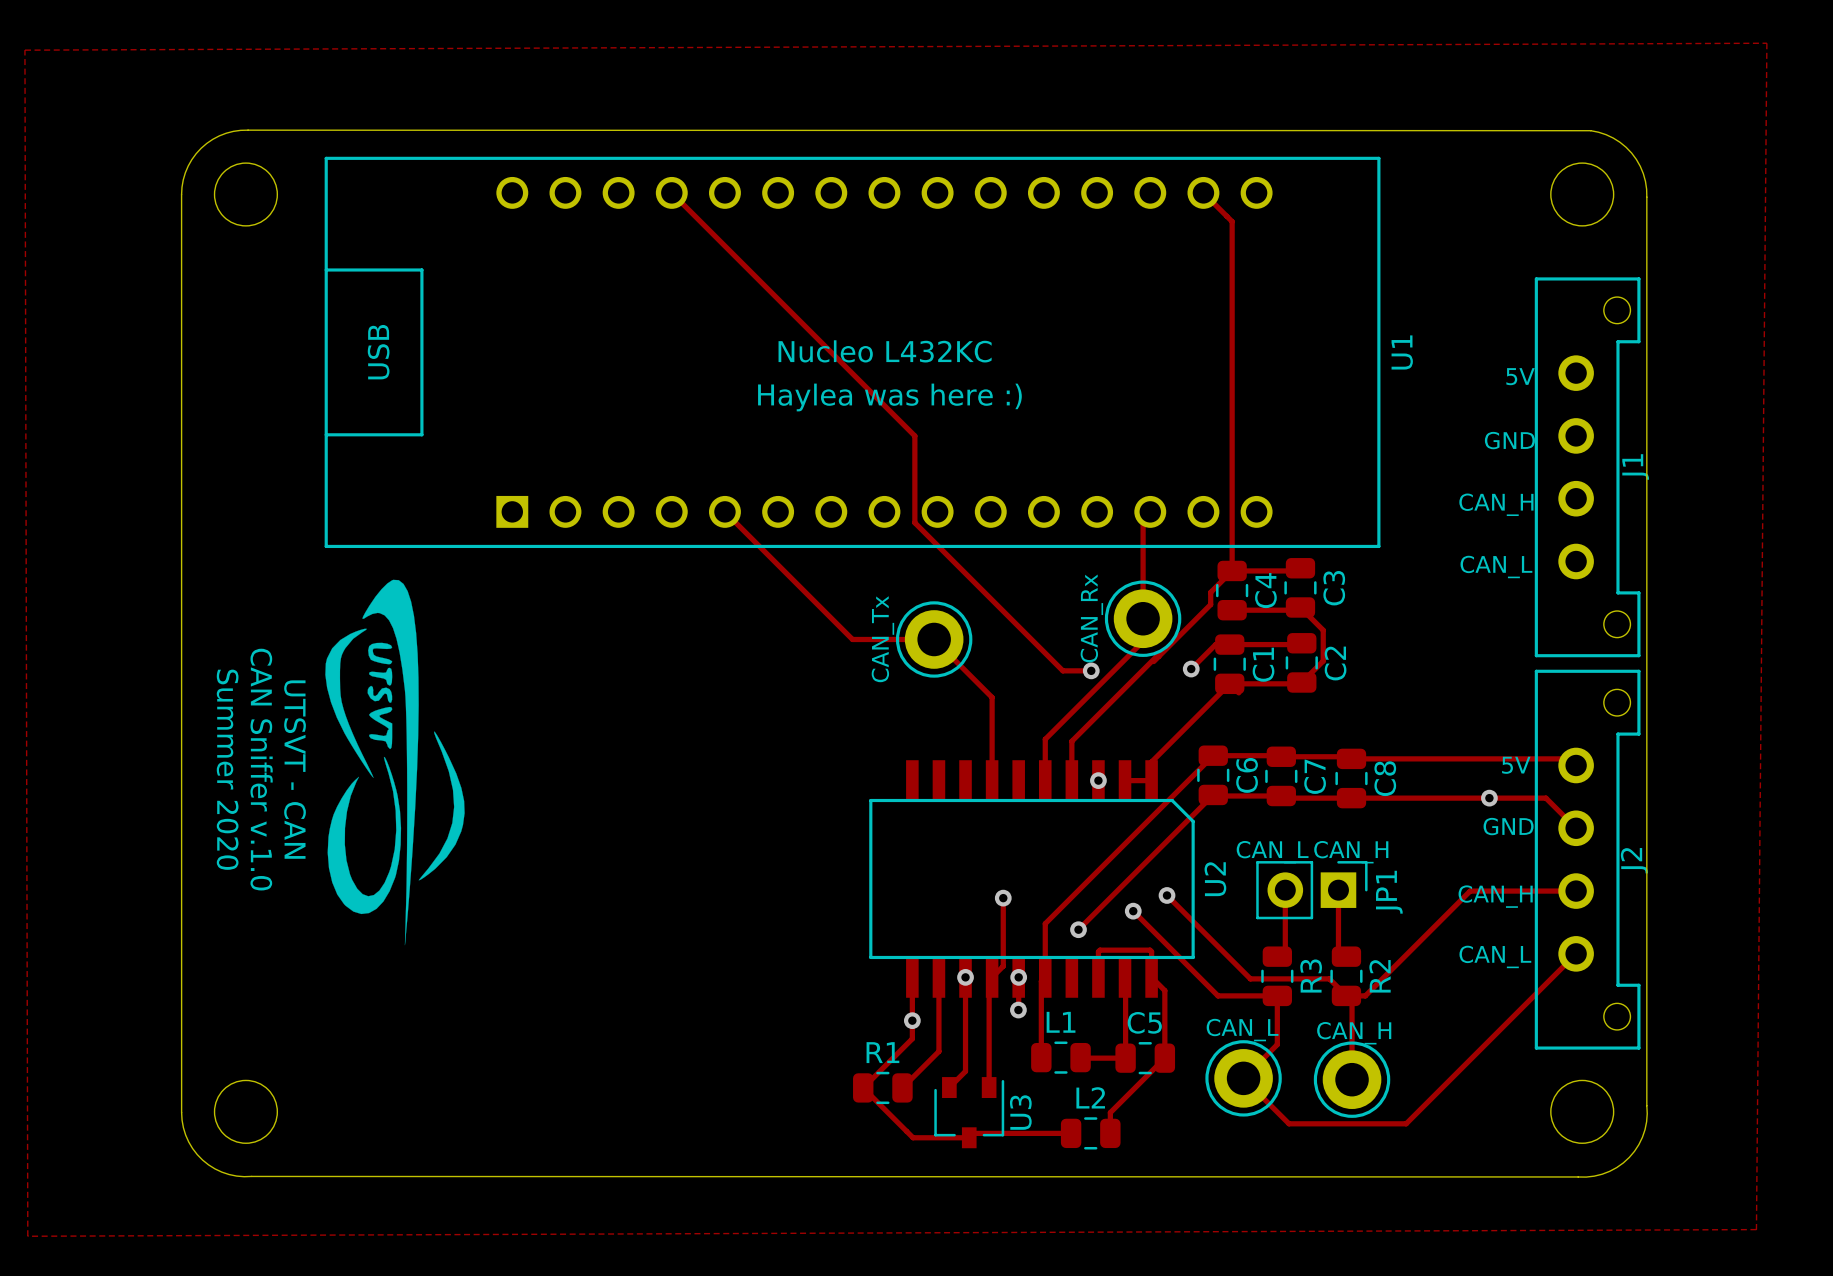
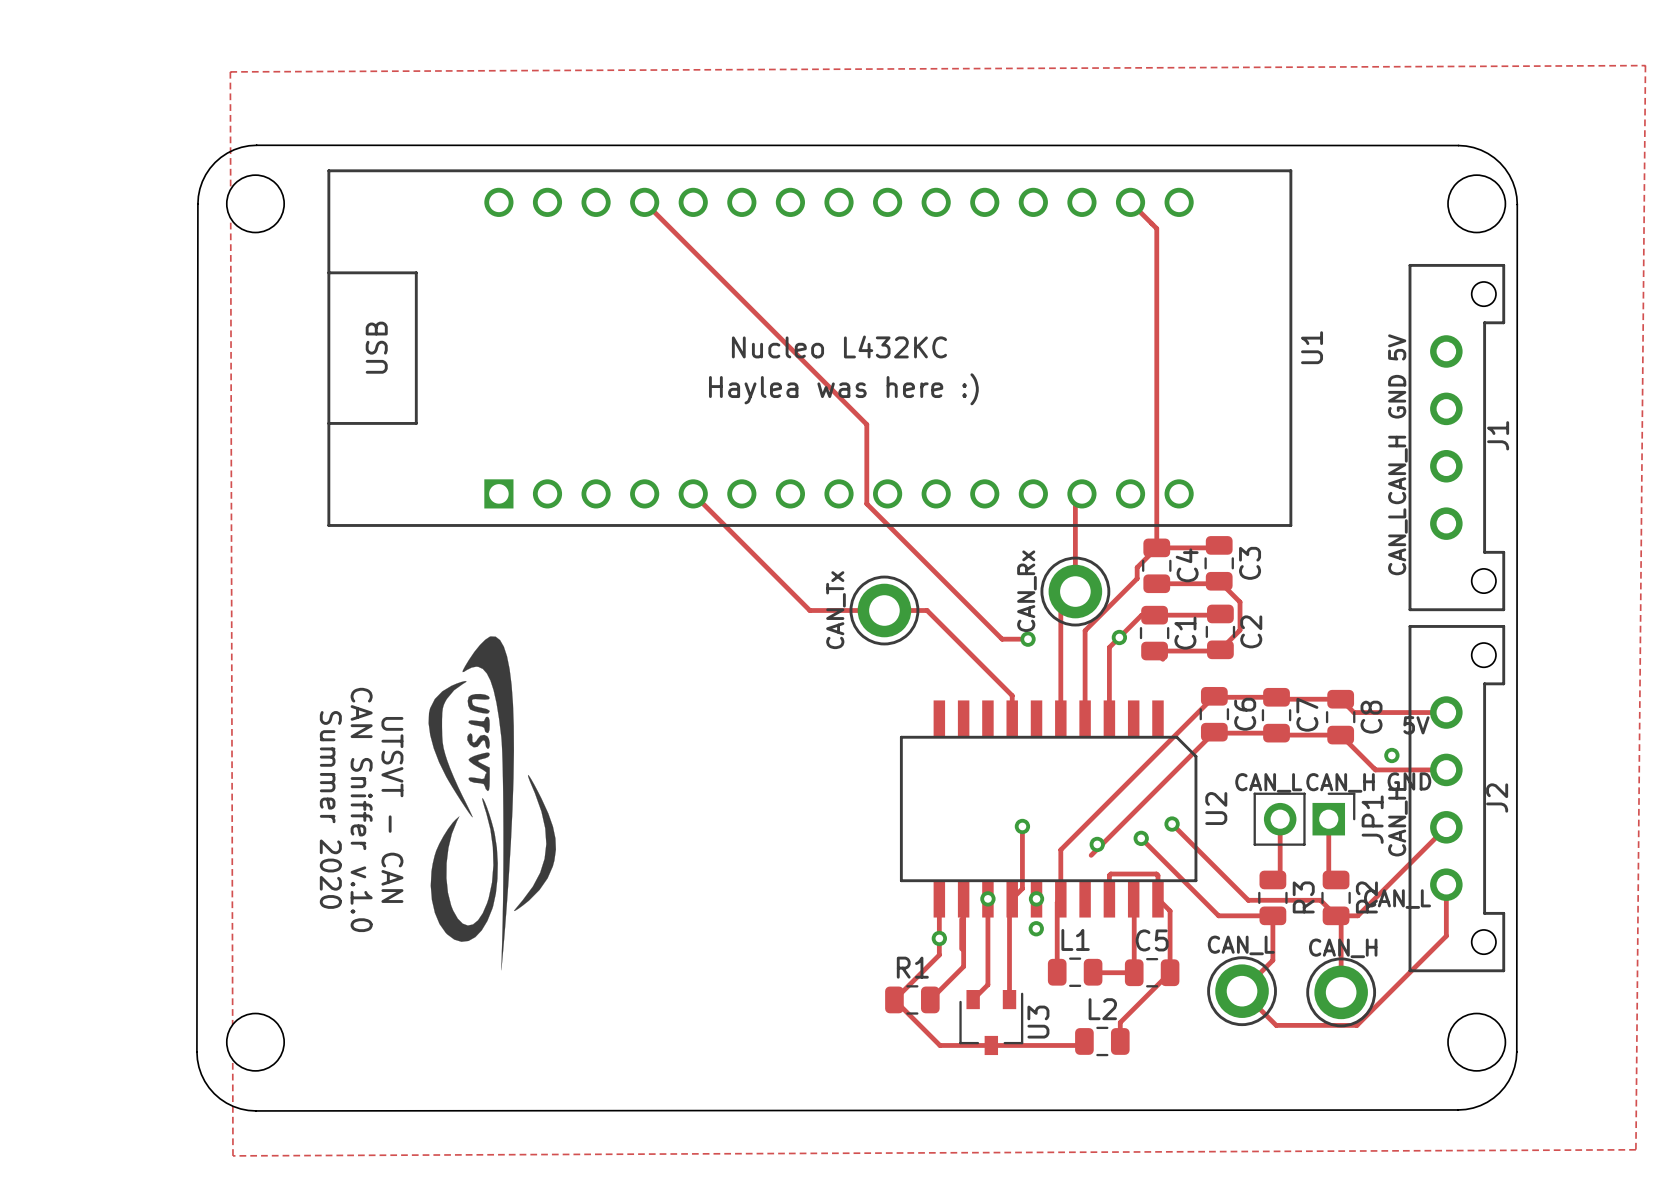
zone outline: (1766, 43) (24, 50) (27, 1236) (1756, 1229) -> (1645, 65) (230, 71) (232, 1155) (1635, 1149)
board edge: (248, 130) (1590, 130) (1606, 134) (1620, 142) (1631, 153) (1640, 166) (1645, 181) (1646, 197) (1647, 1113) (1642, 1137) (1634, 1151) (1616, 1167) (1602, 1174) (1586, 1177) (244, 1176) (229, 1174) (208, 1164) (197, 1154) (188, 1142) (183, 1127) (181, 1112) (181, 194) (183, 179) (188, 166) (201, 148) (219, 135) (233, 131) (248, 130) -> (256, 145) (234, 149) (215, 162) (202, 181) (197, 204) (196, 1051) (201, 1074) (209, 1087) (220, 1098) (233, 1106) (255, 1110) (1458, 1109) (1480, 1105) (1493, 1098) (1504, 1087) (1514, 1067) (1516, 1051) (1517, 204) (1512, 182) (1505, 168) (1494, 157) (1473, 147) (1458, 145) (256, 145)
text rotation: 0° (1520, 376) -> 90° counterclockwise (1397, 347)
text rotation: 0° (1509, 440) -> 90° counterclockwise (1397, 396)
J1 position: (1587, 467) -> (1456, 437)
text rotation: 0° (1496, 504) -> 90° counterclockwise (1397, 469)
text rotation: 0° (1496, 566) -> 90° counterclockwise (1397, 541)
track: (1143, 618) (1143, 641) (1045, 739) (1045, 780) -> none
track: none -> (1060, 606) (1060, 719)
track: (934, 639) (992, 697) (992, 780) -> (884, 610) (927, 610) (1012, 695) (1012, 719)
track: (1158, 656) (1071, 741) (1071, 780) -> none
track: none -> (1085, 630) (1085, 719)
track: none -> (1119, 637) (1109, 647) (1109, 719)
track: (1229, 683) (1151, 761) (1151, 780) (1125, 780) -> none
track: none -> (1446, 712) (1353, 712) (1340, 699) (1214, 696) (1060, 849) (1060, 898) (1057, 902) (1057, 972)
drawing position: (394, 762) -> (492, 803)
track: (1576, 765) (1569, 758) (1351, 758) (1349, 756) (1213, 755) (1045, 923) (1045, 977) (1041, 981) (1041, 1057) -> none
text position: Summer 2020 (227, 769) -> Summer 2020 (330, 809)
text position: CAN Sniffer v.1.0 (261, 769) -> CAN Sniffer v.1.0 (361, 809)
text position: UTSVT - CAN (295, 769) -> UTSVT - CAN (392, 809)
C6 position: (1213, 775) -> (1214, 714)
C7 position: (1281, 776) -> (1276, 715)
C8 position: (1351, 778) -> (1340, 717)
via: (1098, 780) -> none
track: none -> (1446, 769) (1375, 769) (1340, 735) (1214, 732) (1091, 855)
track: (1576, 828) (1545, 798) (1283, 798) (1281, 796) (1213, 794) (1078, 929) -> none
text: none -> CAN_H (1340, 782)
text: CAN_L (1272, 852) -> none
text: CAN_H (1351, 852) -> CAN_L (1268, 782)
J2 position: (1587, 859) -> (1456, 798)
via: none -> (1172, 824)
via: none -> (1022, 826)
track: none -> (1446, 827) (1357, 915) (1336, 915)
U2 position: (1031, 878) -> (1048, 808)
track: none -> (1141, 838) (1218, 915) (1272, 915) (1272, 960) (1242, 991) (1276, 1025) (1356, 1025) (1446, 936) (1446, 884)
via: none -> (1141, 838)
track: (1285, 890) (1285, 948) (1277, 956) -> (1280, 819) (1280, 872) (1272, 879)
JP1 position: (1311, 890) -> (1304, 819)
track: (1338, 890) (1338, 948) (1346, 956) -> (1328, 819) (1328, 872) (1336, 879)
track: (1576, 891) (1470, 891) (1365, 995) (1346, 995) -> none
track: (1167, 895) (1250, 978) (1329, 978) (1352, 1001) (1352, 1079) -> (1172, 824) (1248, 900) (1320, 900) (1341, 920) (1341, 992)
text rotation: 0° (1495, 896) -> 90° counterclockwise (1397, 822)
track: (1003, 898) (1003, 966) (989, 980) (989, 1087) -> (1022, 826) (1022, 888) (1009, 901) (1009, 999)
via: (1003, 898) -> none
track: (1133, 911) (1218, 995) (1277, 995) (1277, 1044) (1243, 1078) (1289, 1123) (1406, 1123) (1576, 953) -> none
via: (1133, 911) -> none
via: (1078, 929) -> none
track: none -> (939, 898) (939, 955) (894, 999) (939, 1045) (1080, 1045) (1084, 1041)
via: none -> (987, 898)
via: none -> (1036, 898)
R3 position: (1277, 976) -> (1272, 897)
R2 position: (1346, 976) -> (1336, 897)
track: (912, 977) (912, 1038) (863, 1087) (913, 1137) (969, 1137) (973, 1133) (1071, 1133) (1066, 1137) -> none
track: (938, 977) (938, 1051) (902, 1087) -> (963, 898) (963, 966) (930, 999)
track: (965, 977) (965, 1071) (949, 1087) -> (987, 898) (987, 984) (973, 999)
via: (965, 977) -> none
via: (1018, 977) -> none
track: (1098, 977) (1100, 950) (1150, 950) (1151, 977) (1164, 990) (1164, 1058) (1110, 1112) (1110, 1133) -> (1109, 898) (1110, 874) (1156, 874) (1157, 898) (1170, 910) (1170, 972) (1120, 1022) (1120, 1041)
track: (1125, 977) (1125, 1058) (1080, 1057) -> (1133, 898) (1134, 972) (1093, 972)
via: none -> (1036, 928)
via: none -> (939, 938)
via: (1018, 1010) -> none
text: none -> CAN_H (1343, 948)
via: (912, 1020) -> none
text: CAN_L (1242, 1030) -> none
text: CAN_H (1354, 1033) -> CAN_L (1241, 945)
L1 position: (1060, 1057) -> (1075, 972)
part: none -> (1341, 992)
C5 position: (1145, 1058) -> (1152, 972)
part: (1243, 1078) -> none
part position: (1352, 1079) -> (1242, 991)
R1 position: (882, 1087) -> (912, 999)
U3 position: (969, 1112) -> (991, 1022)
L2 position: (1090, 1133) -> (1102, 1041)

